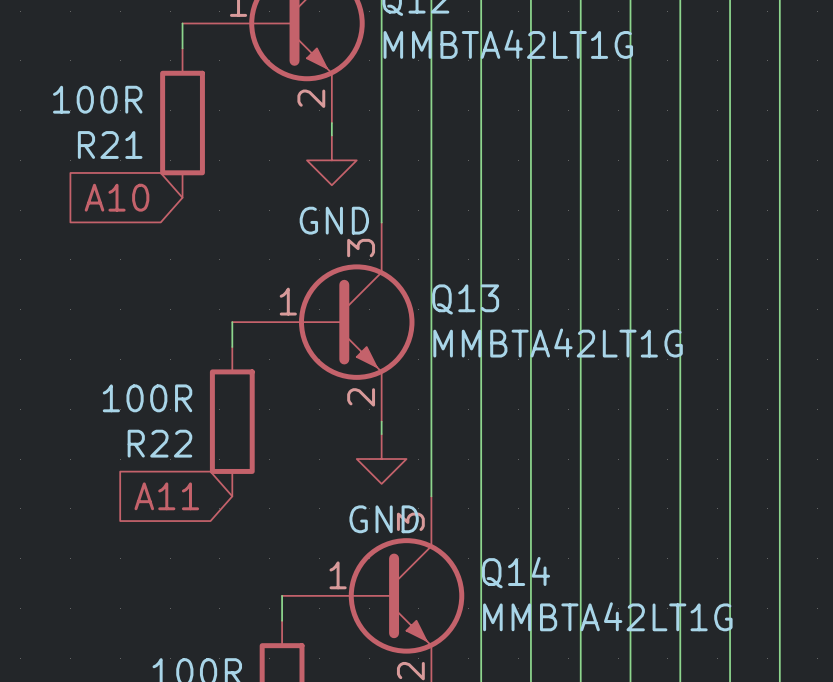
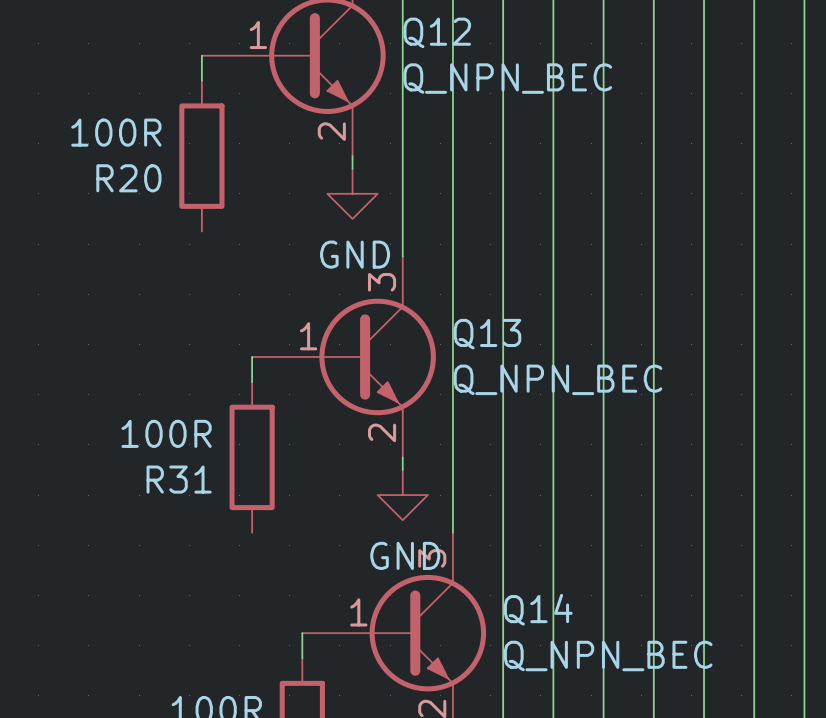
Q12 value: MMBTA42LT1G (508, 44) -> Q_NPN_BEC (507, 78)
R21 name: R21 (110, 145) -> R20 (128, 178)
global label: A10 (117, 197) -> none
Q13 value: MMBTA42LT1G (558, 343) -> Q_NPN_BEC (558, 379)
R22 name: R22 (159, 443) -> R31 (179, 479)
global label: A11 (166, 496) -> none
Q14 value: MMBTA42LT1G (607, 616) -> Q_NPN_BEC (608, 656)

